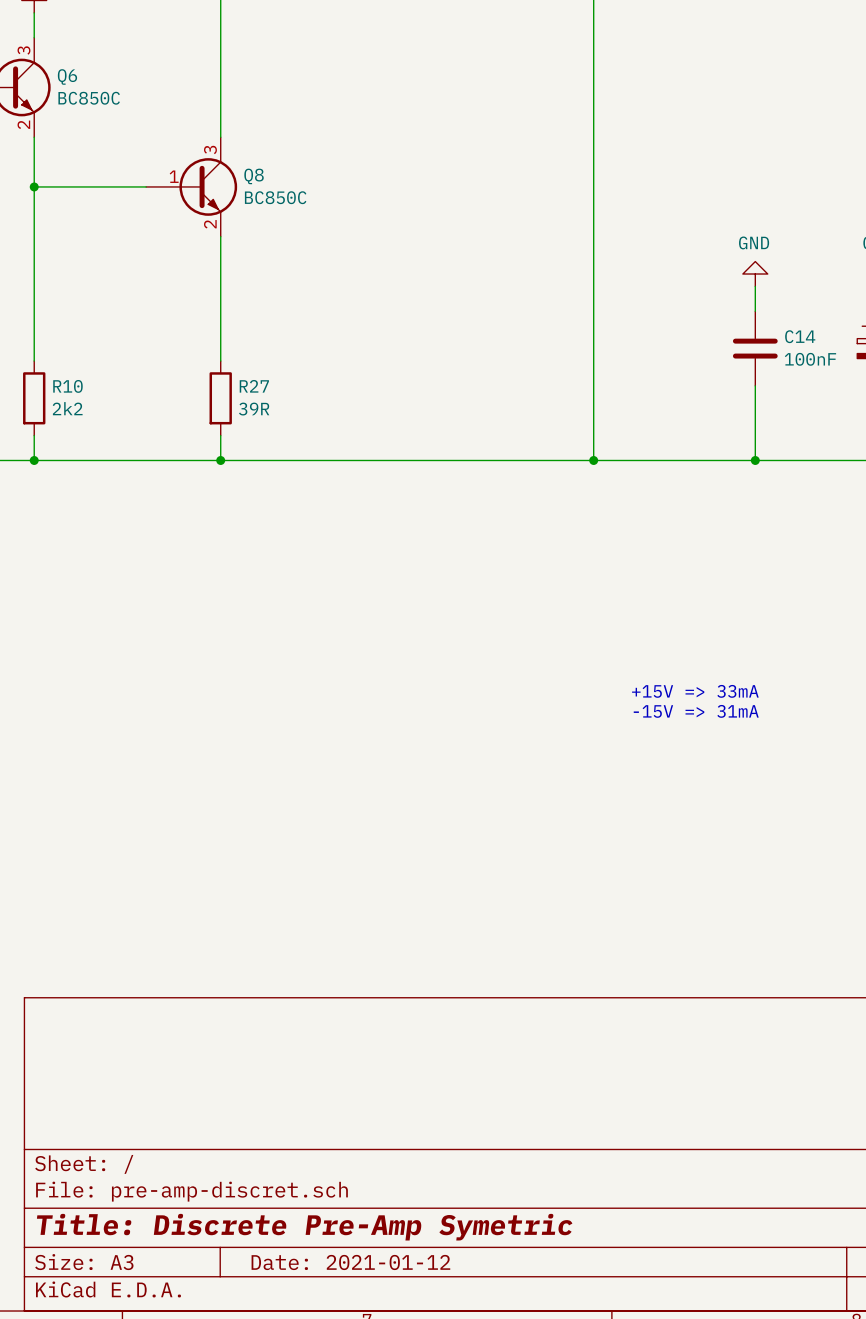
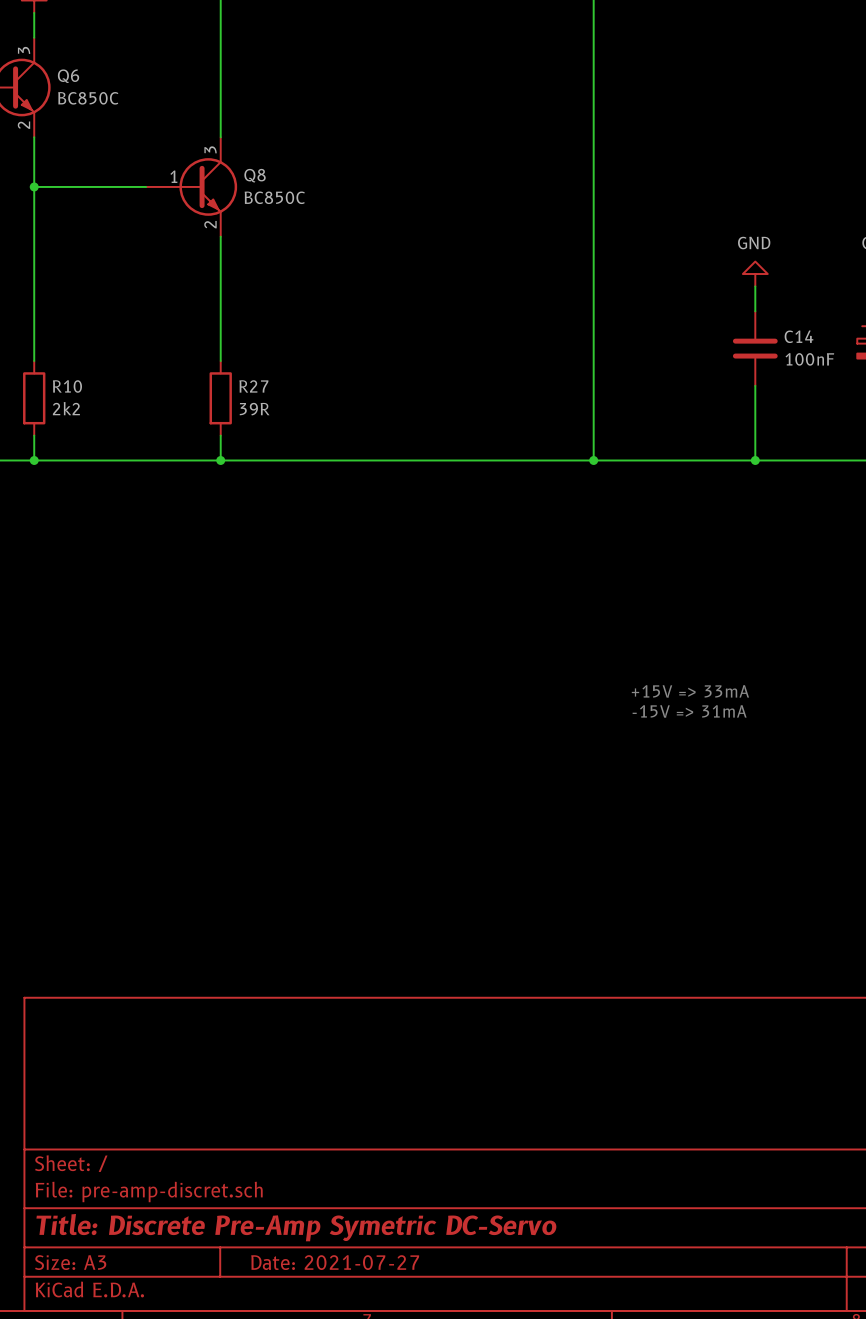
title block: Title: Discrete Pre-Amp Symetric (304, 1227) -> Title: Discrete Pre-Amp Symetric DC-Servo (296, 1227)
title block: Date: 2021-01-12 (350, 1262) -> Date: 2021-07-27 (335, 1262)

